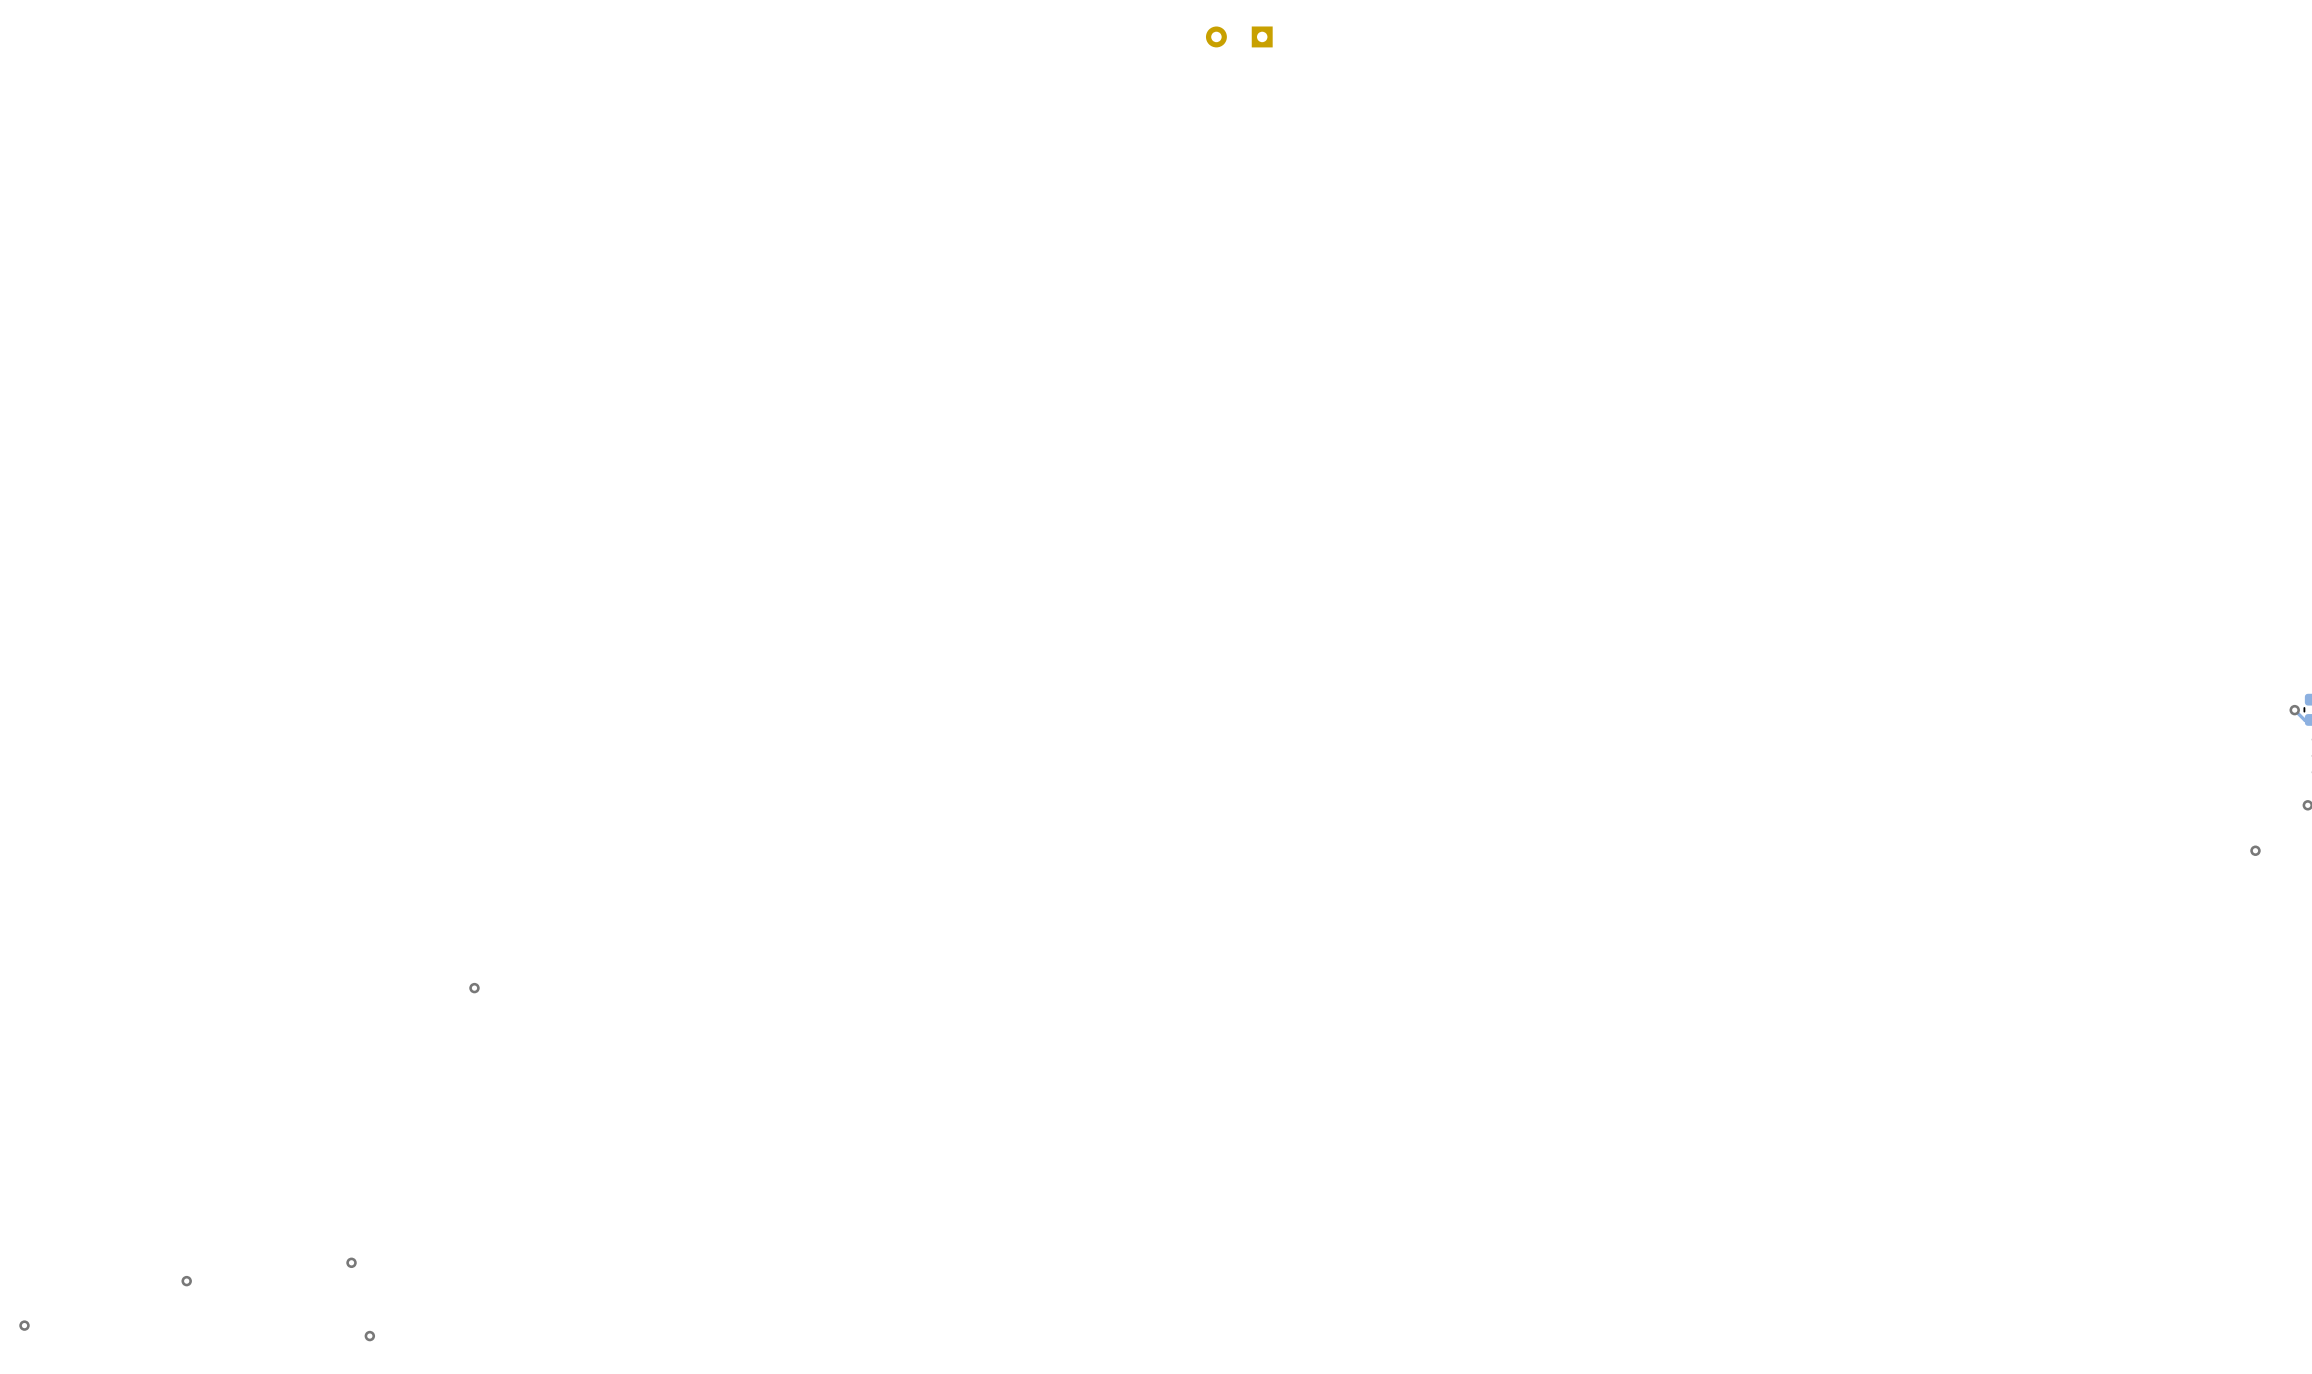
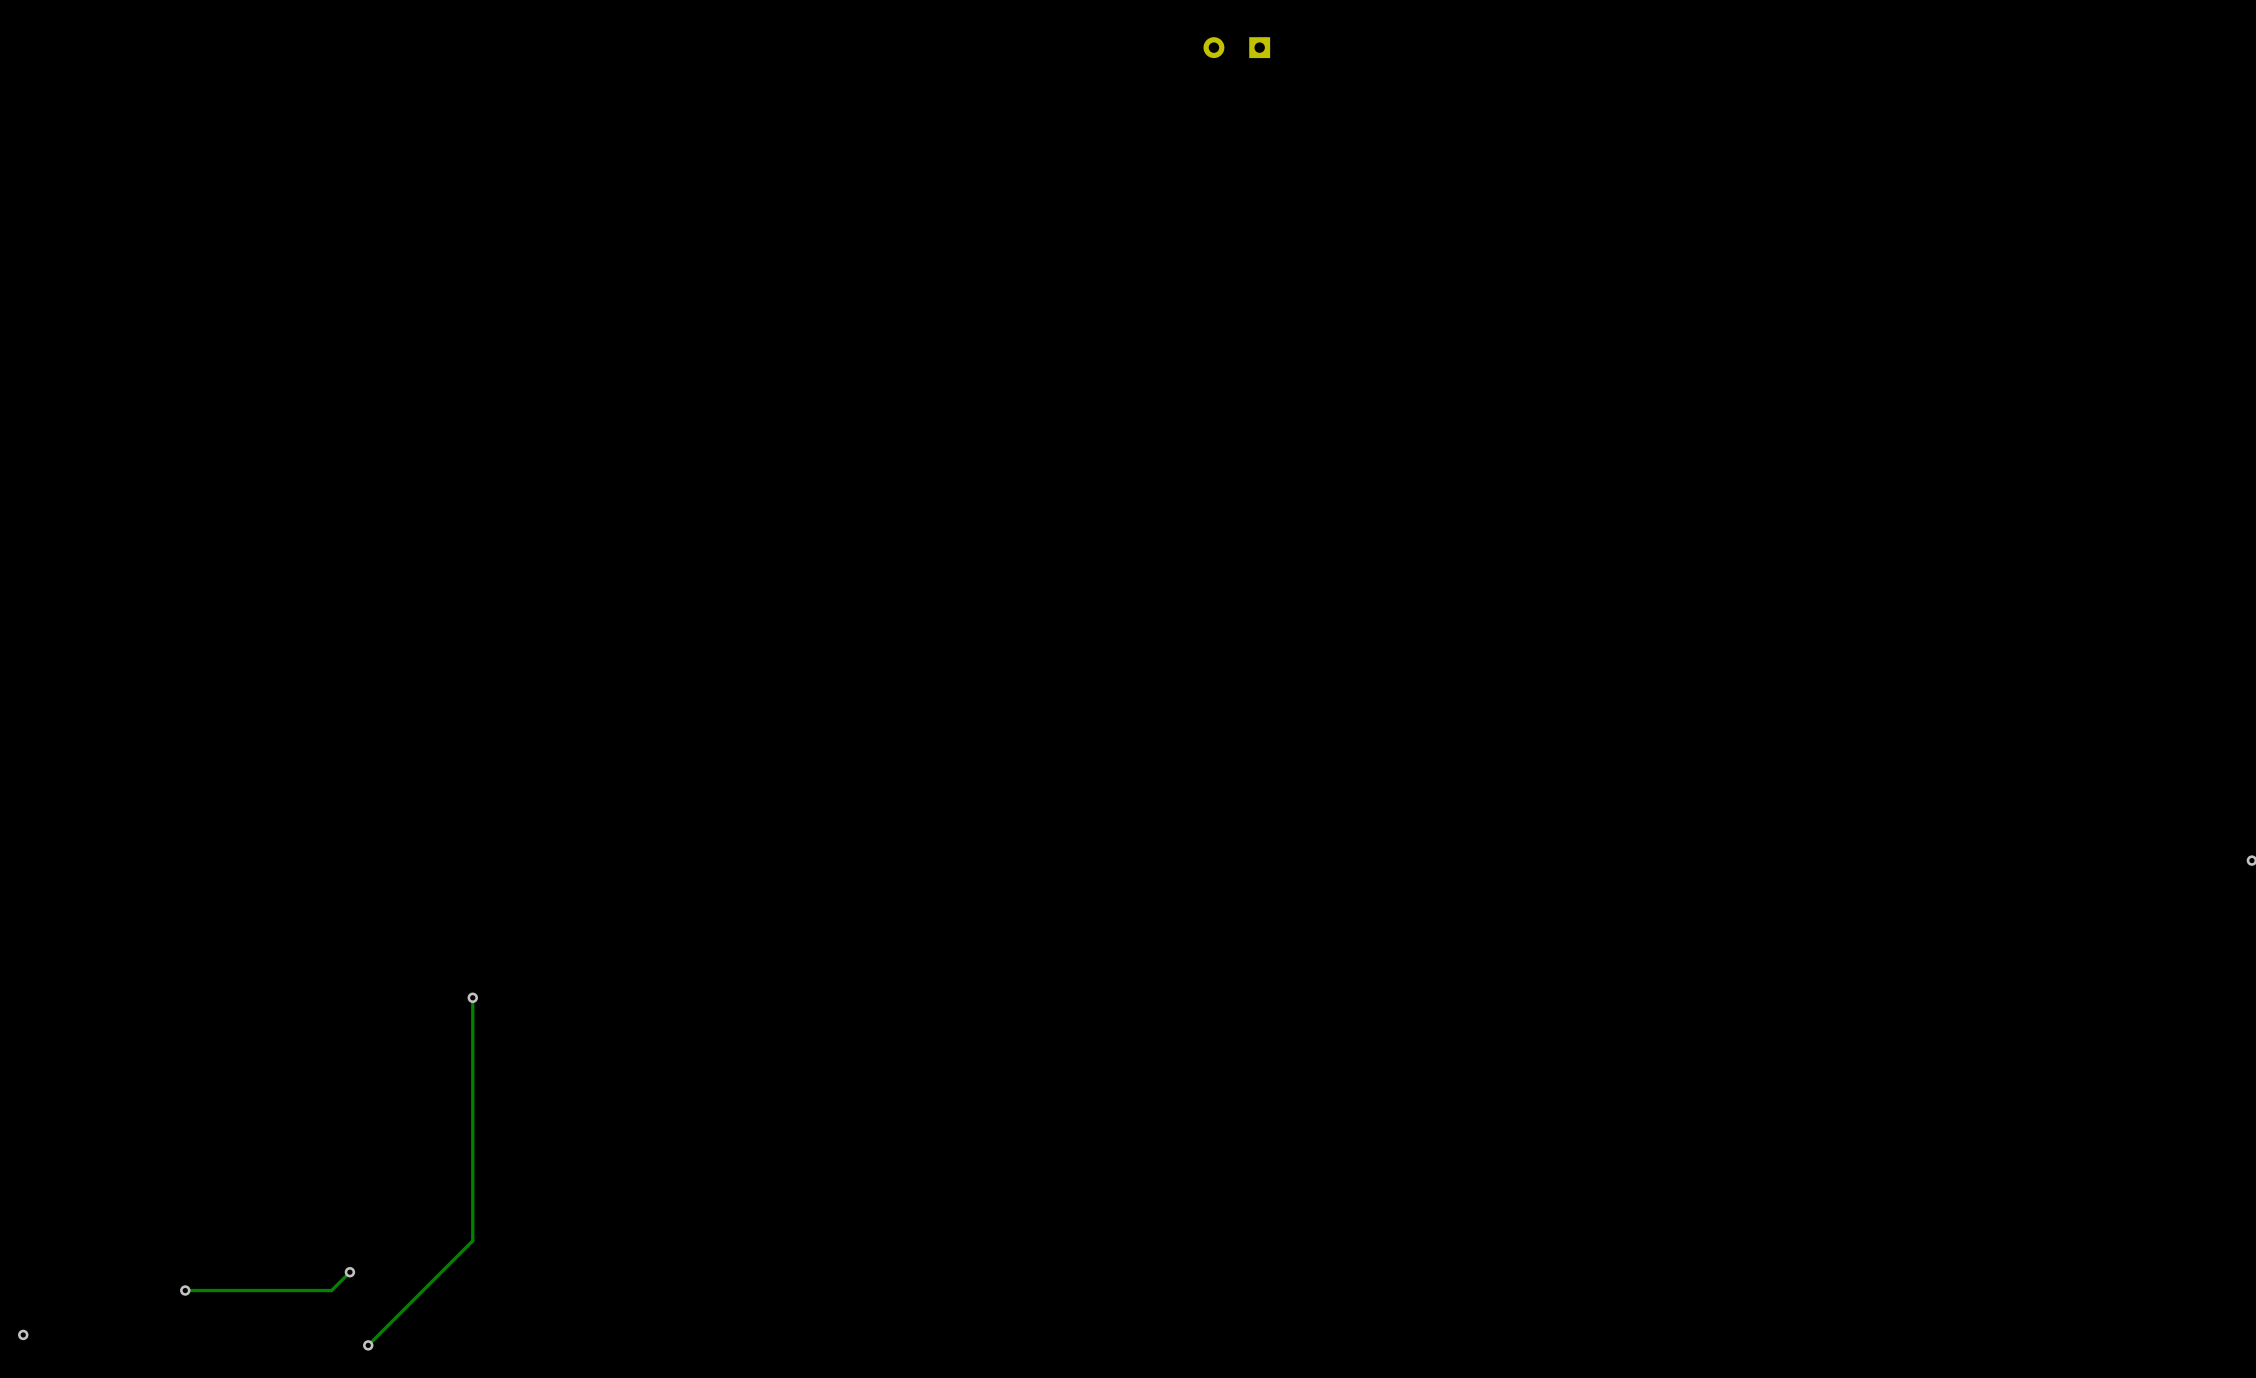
track: none -> (472, 997) (472, 1240) (368, 1345)
track: none -> (349, 1272) (331, 1290) (185, 1290)

